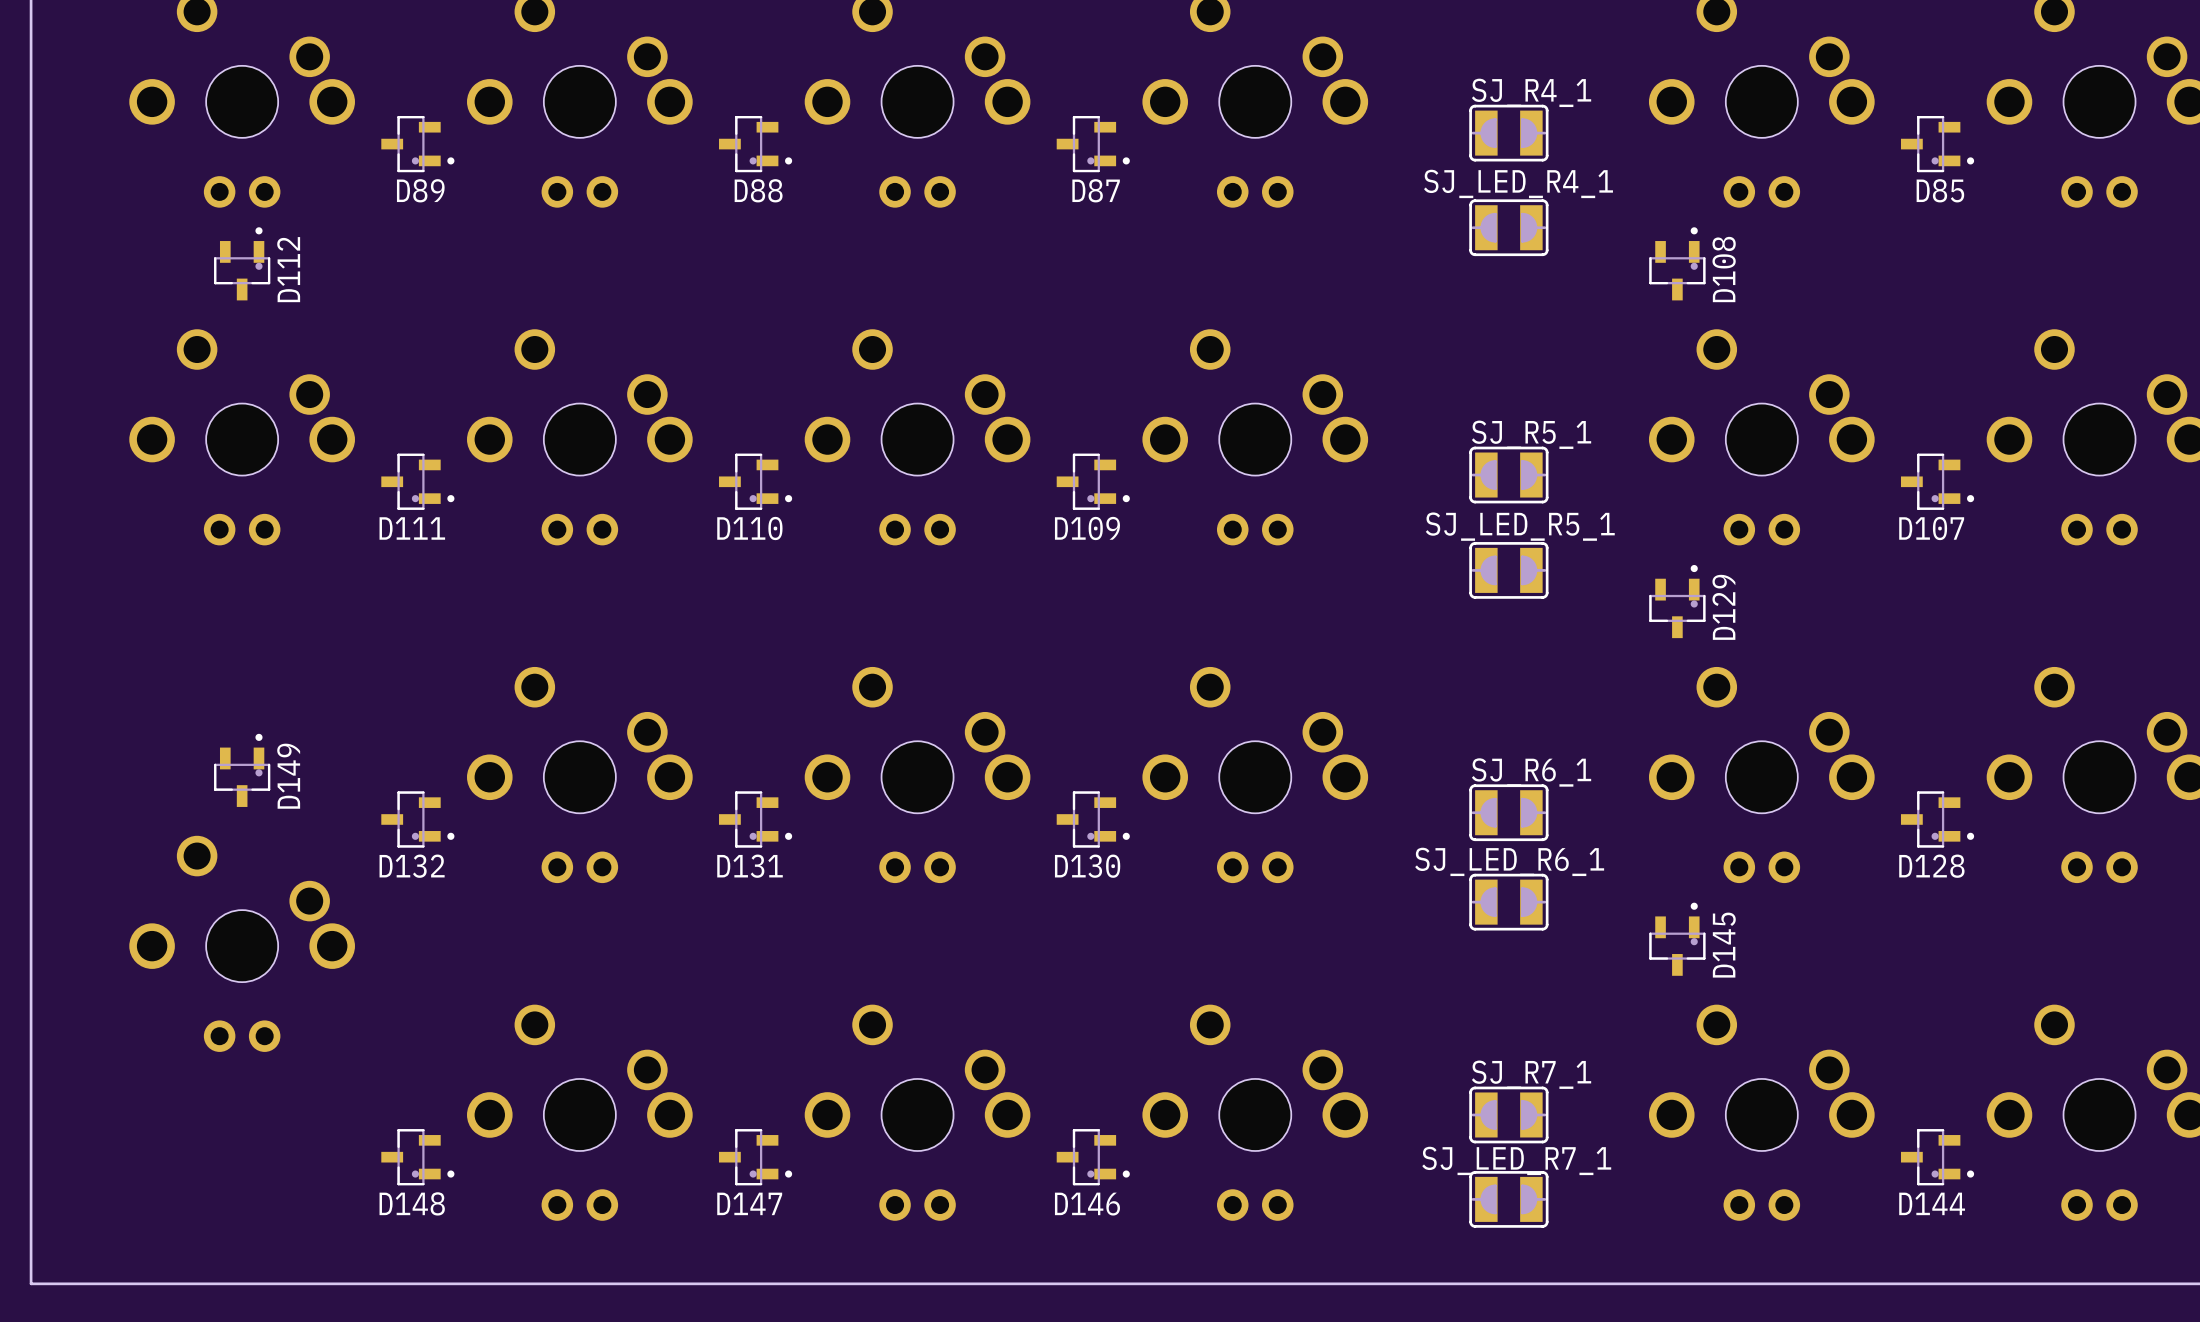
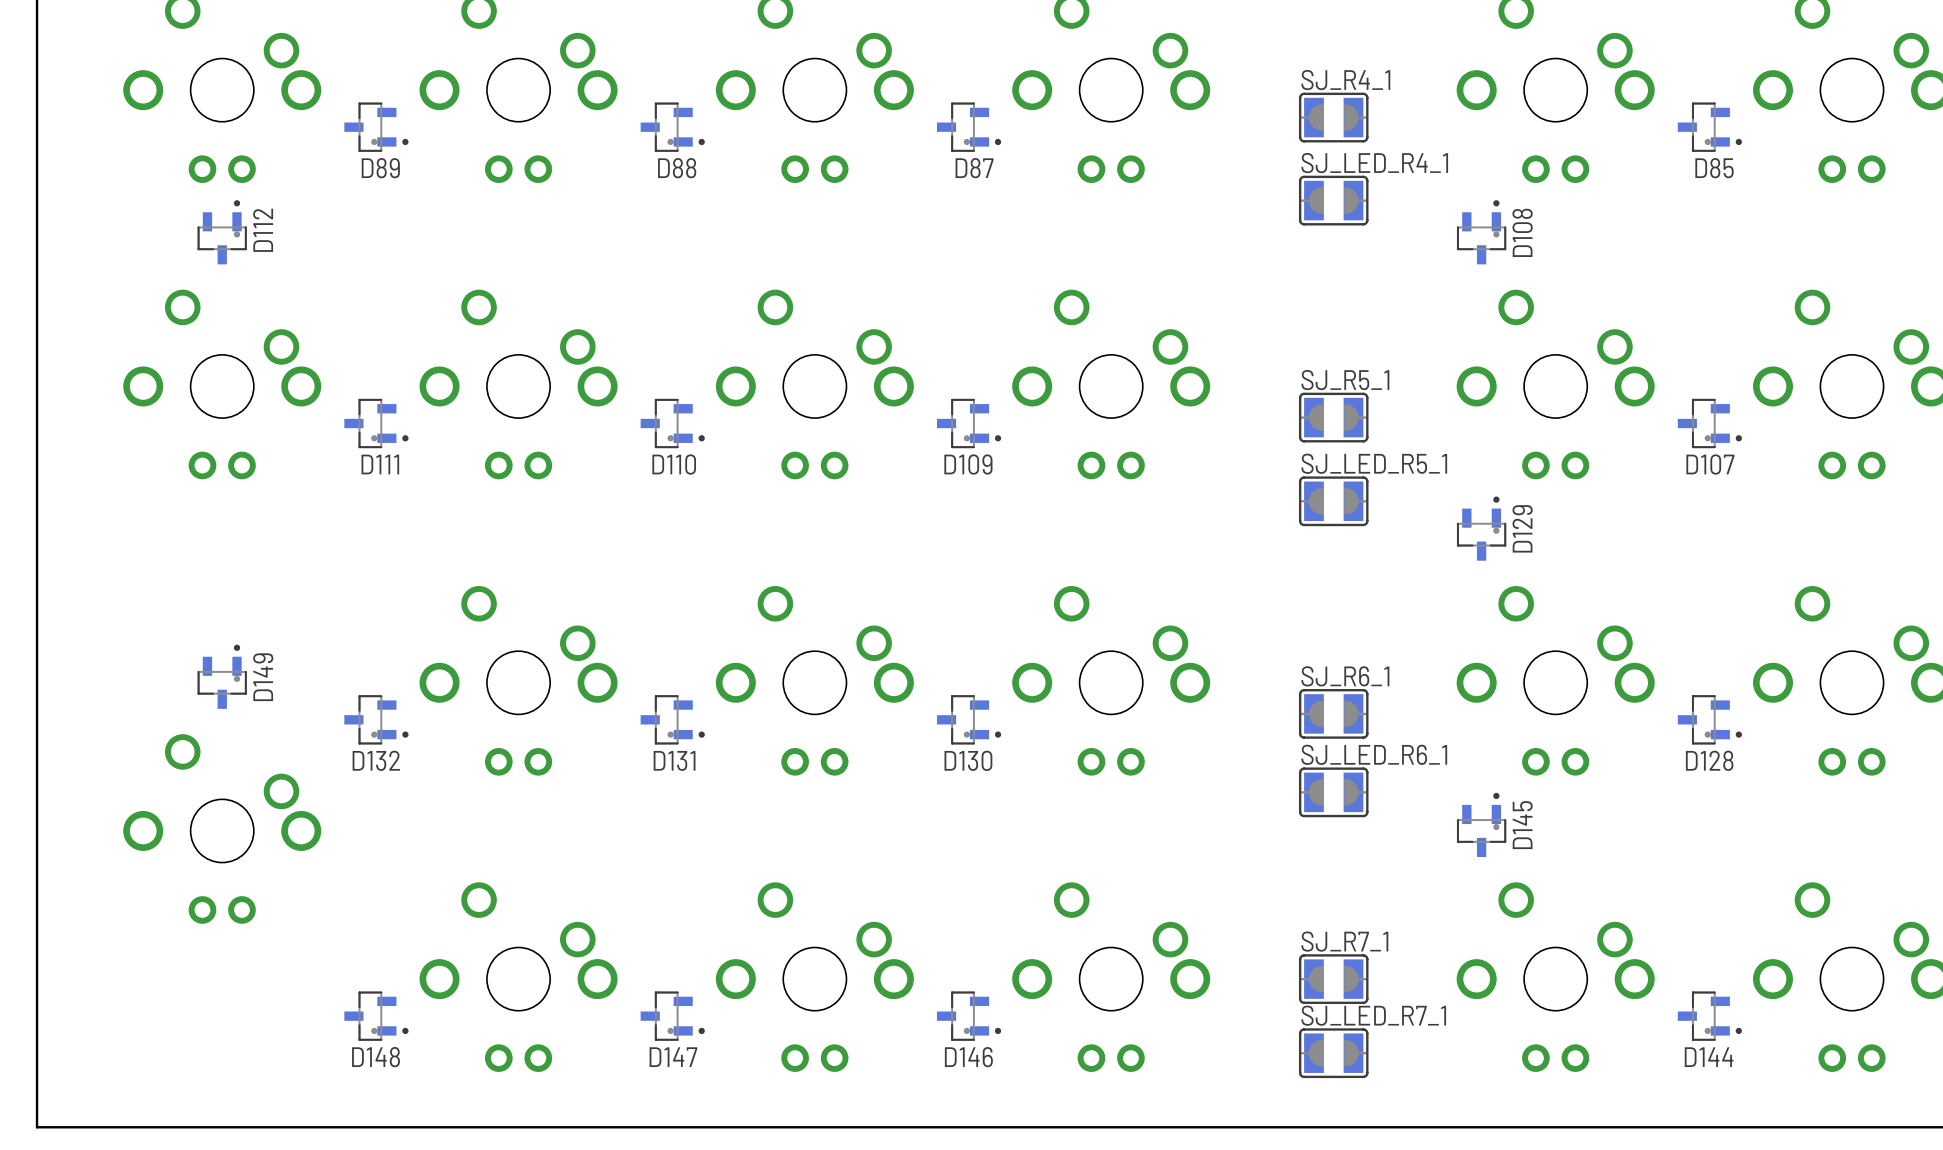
SJ_LED_R4_1 name position: SJ_LED_R4_1 (1518, 183) -> SJ_LED_R4_1 (1374, 163)
SJ_LED_R5_1 name position: SJ_LED_R5_1 (1520, 526) -> SJ_LED_R5_1 (1374, 463)
SJ_LED_R6_1 name position: SJ_LED_R6_1 (1509, 861) -> SJ_LED_R6_1 (1374, 754)
SJ_LED_R7_1 name position: SJ_LED_R7_1 (1516, 1160) -> SJ_LED_R7_1 (1373, 1015)

